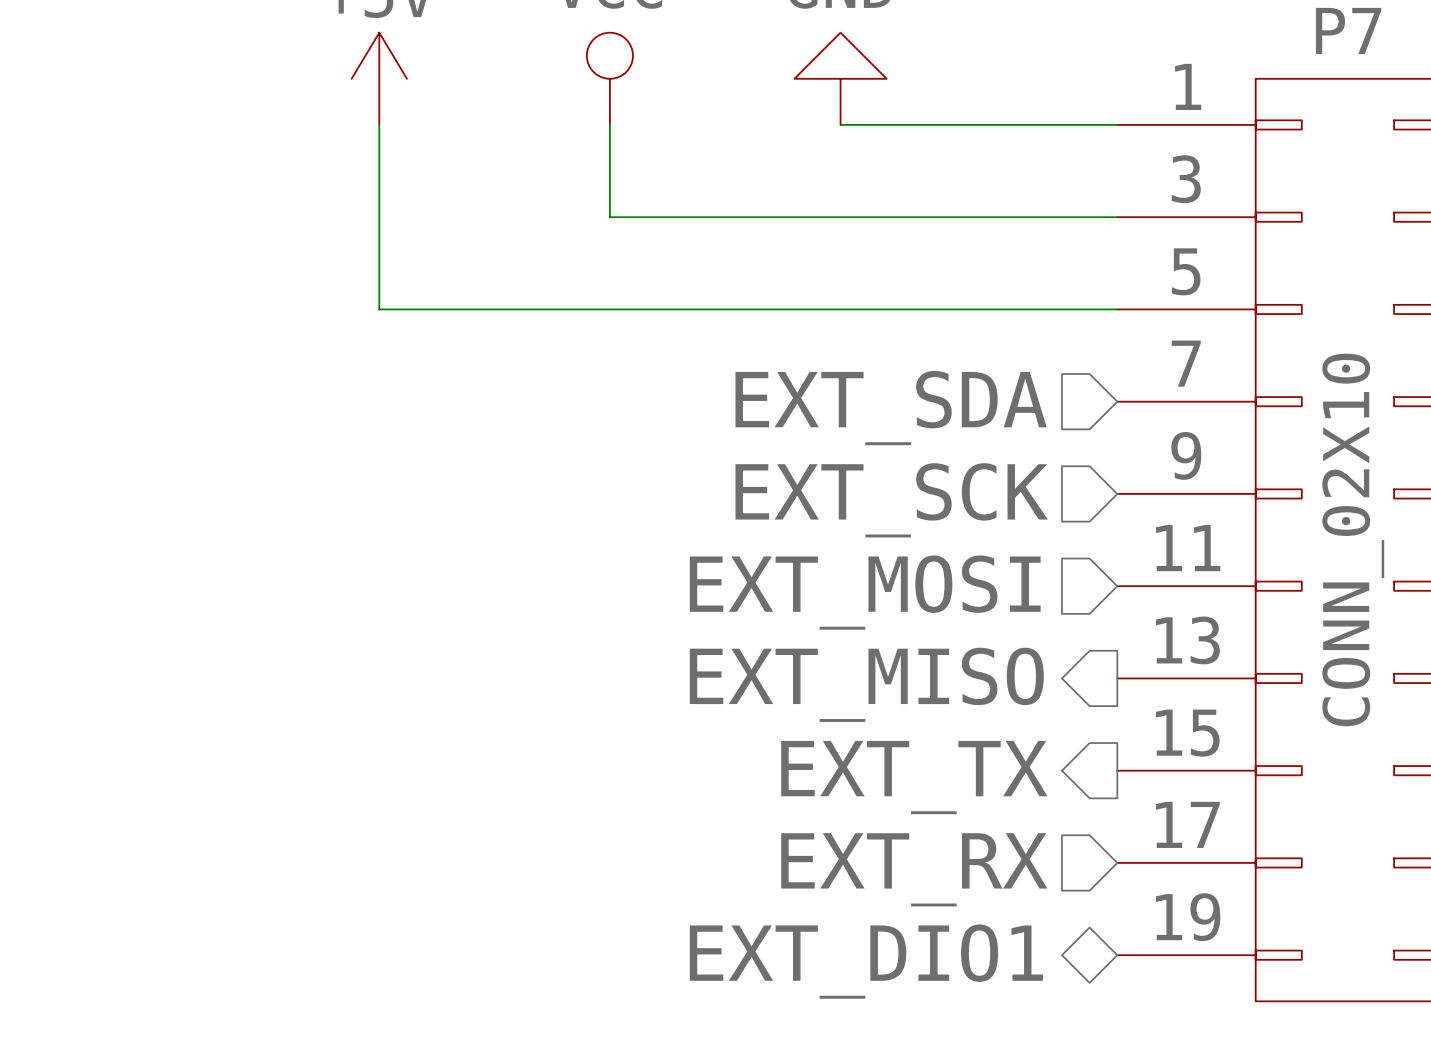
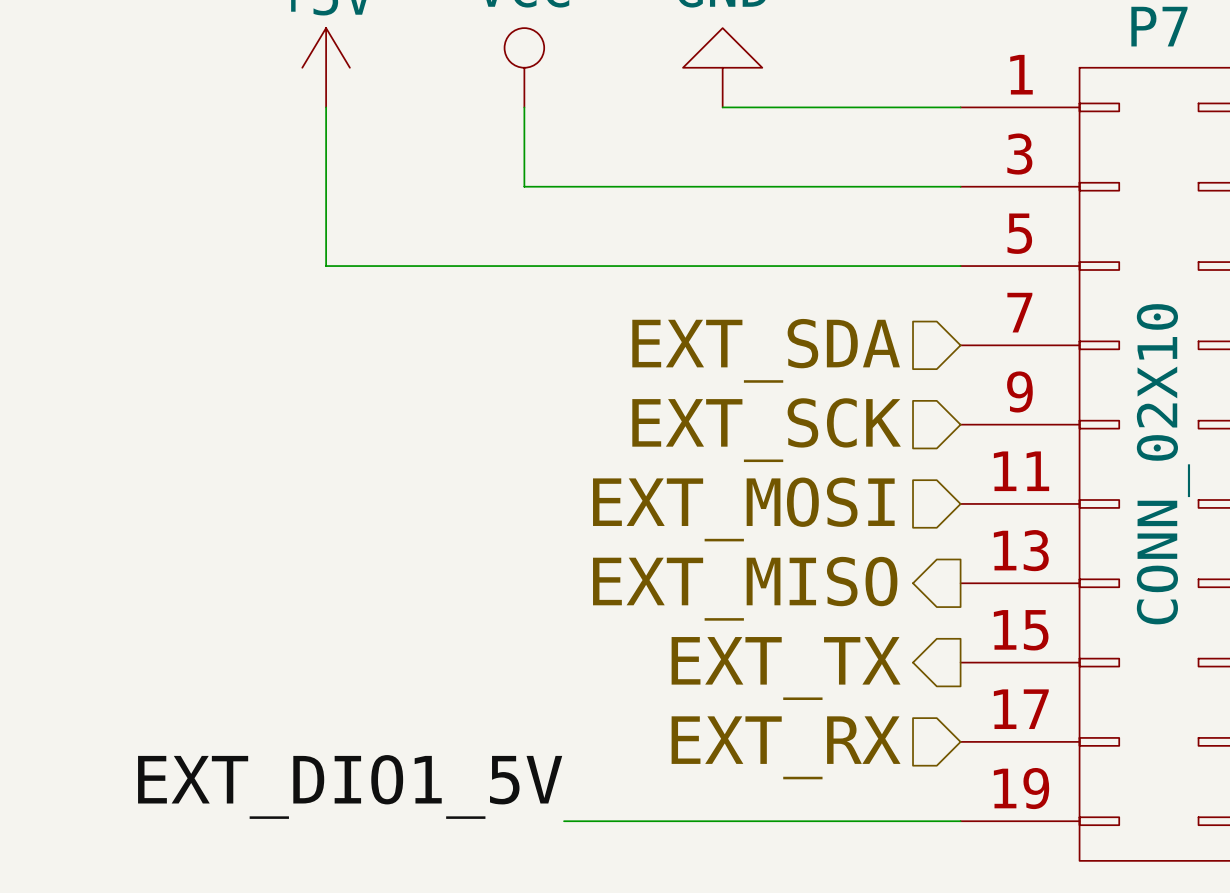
label: none -> EXT_DIO1_5V (350, 786)
wire: none -> (564, 821) (960, 821)
hierarchical label: EXT_DIO1 (866, 961) -> none

